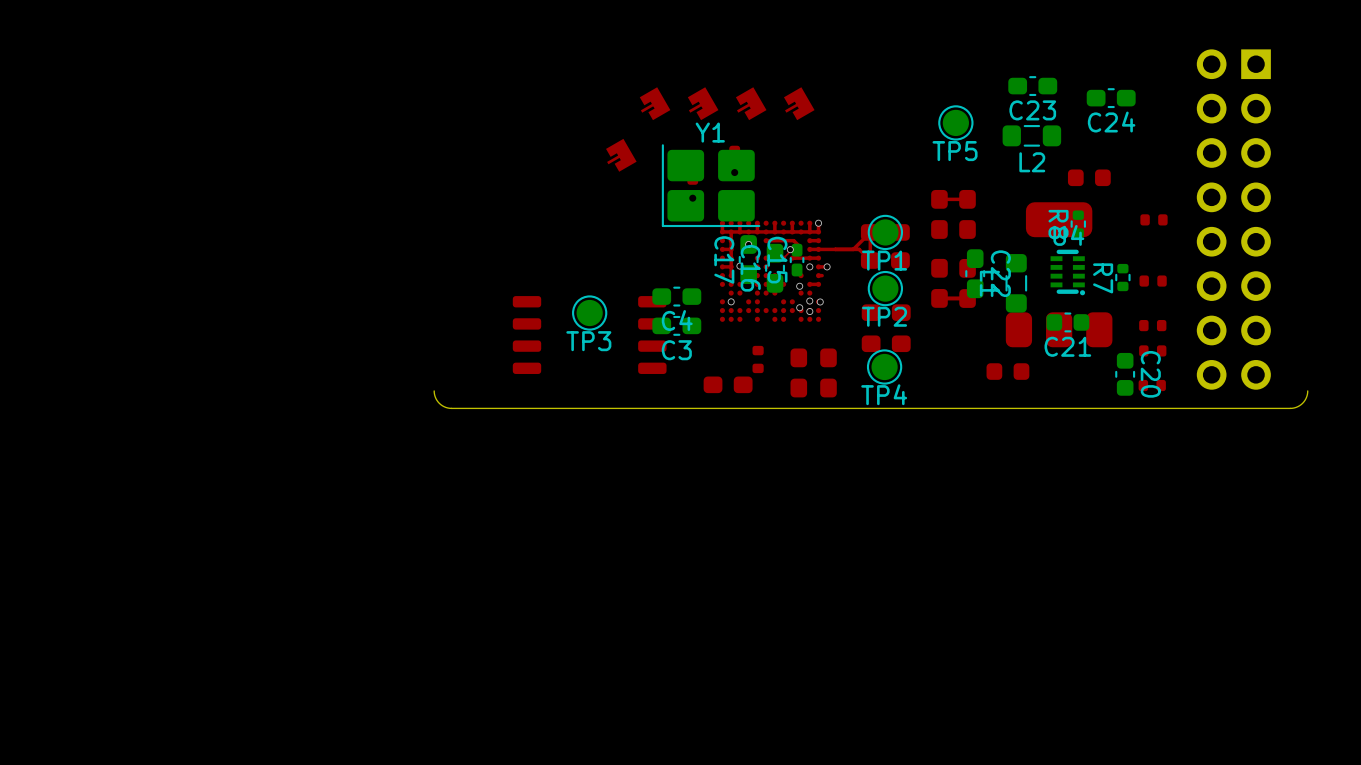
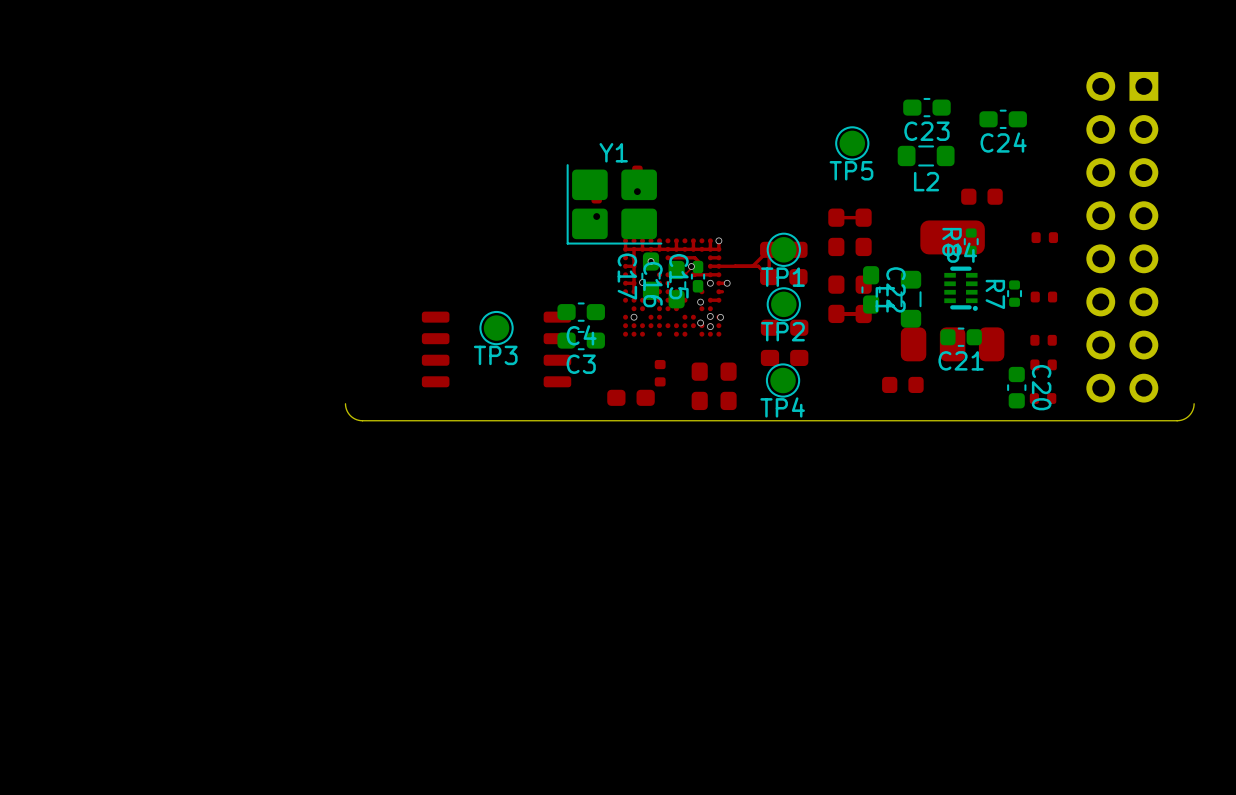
part: (655, 103) -> none
part: (703, 103) -> none
part: (751, 103) -> none
part: (799, 103) -> none
part: (621, 155) -> none

